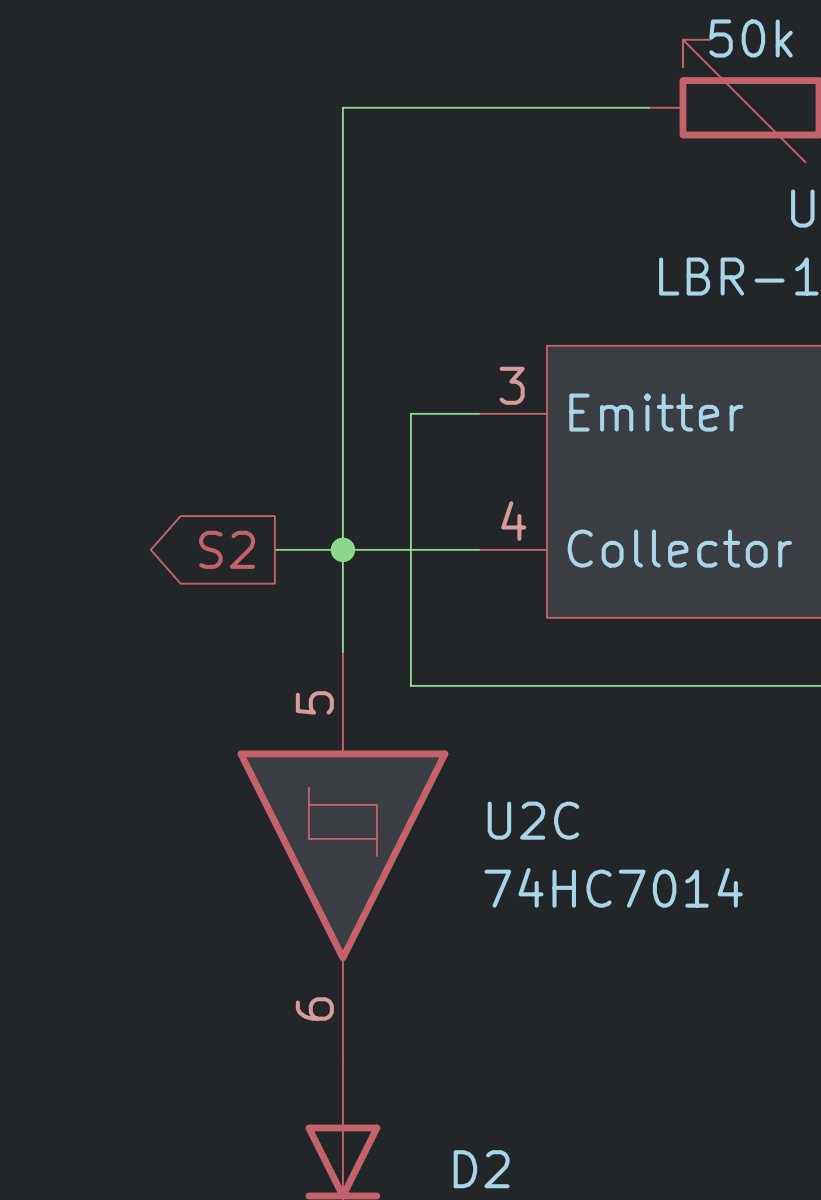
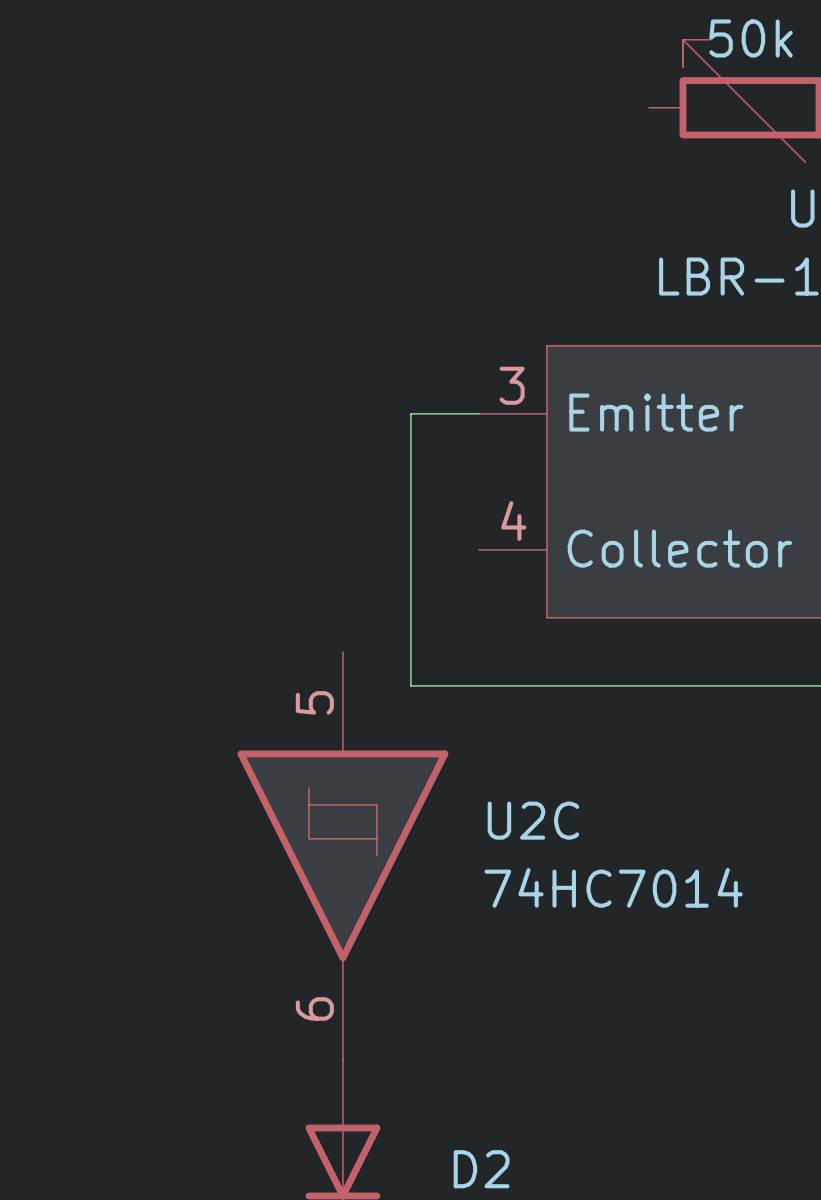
wire: (648, 107) (342, 107) (342, 651) -> none
global label: S2 (227, 549) -> none
wire: (274, 549) (478, 549) -> none
junction: (342, 549) -> none

